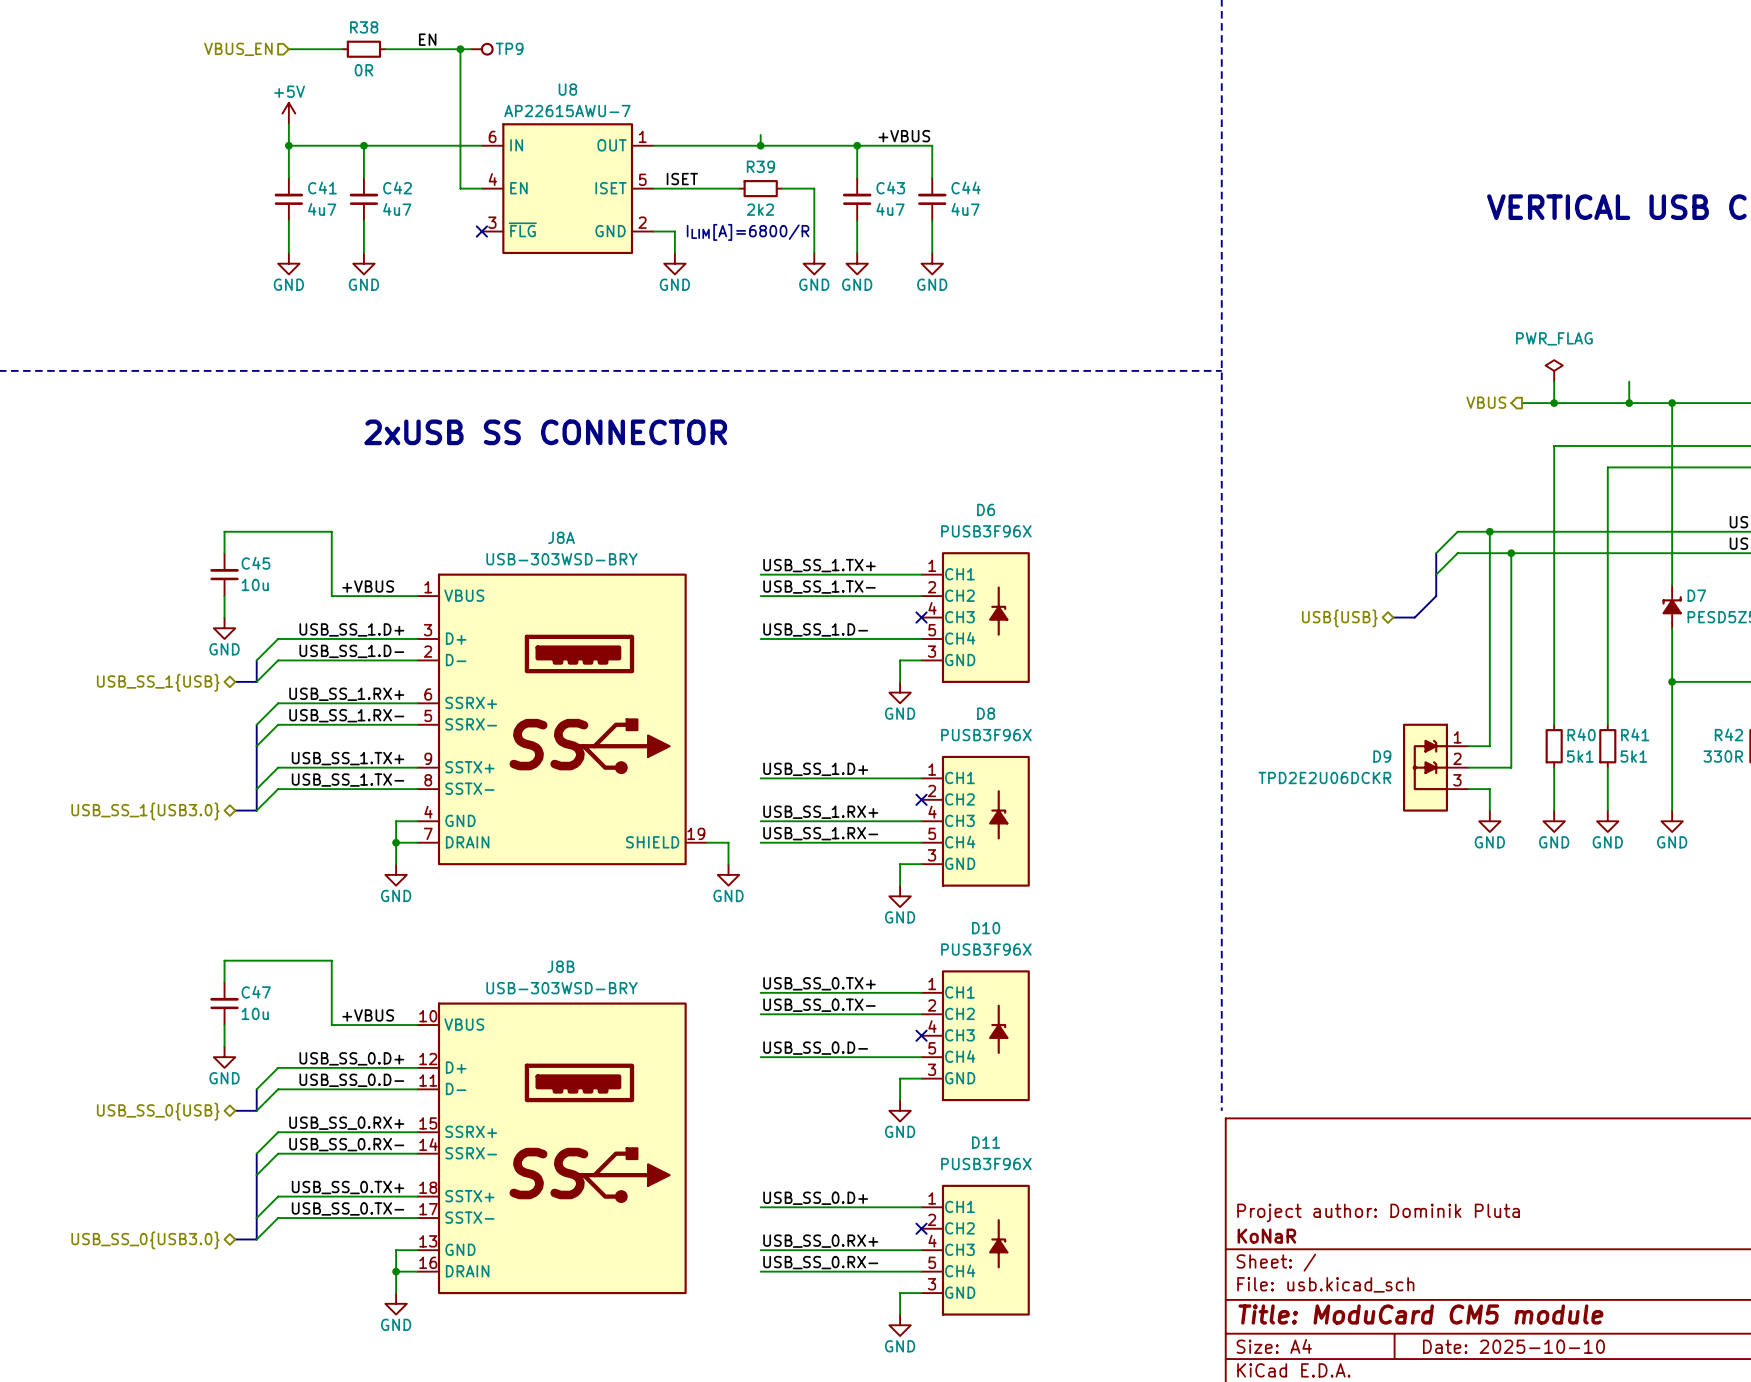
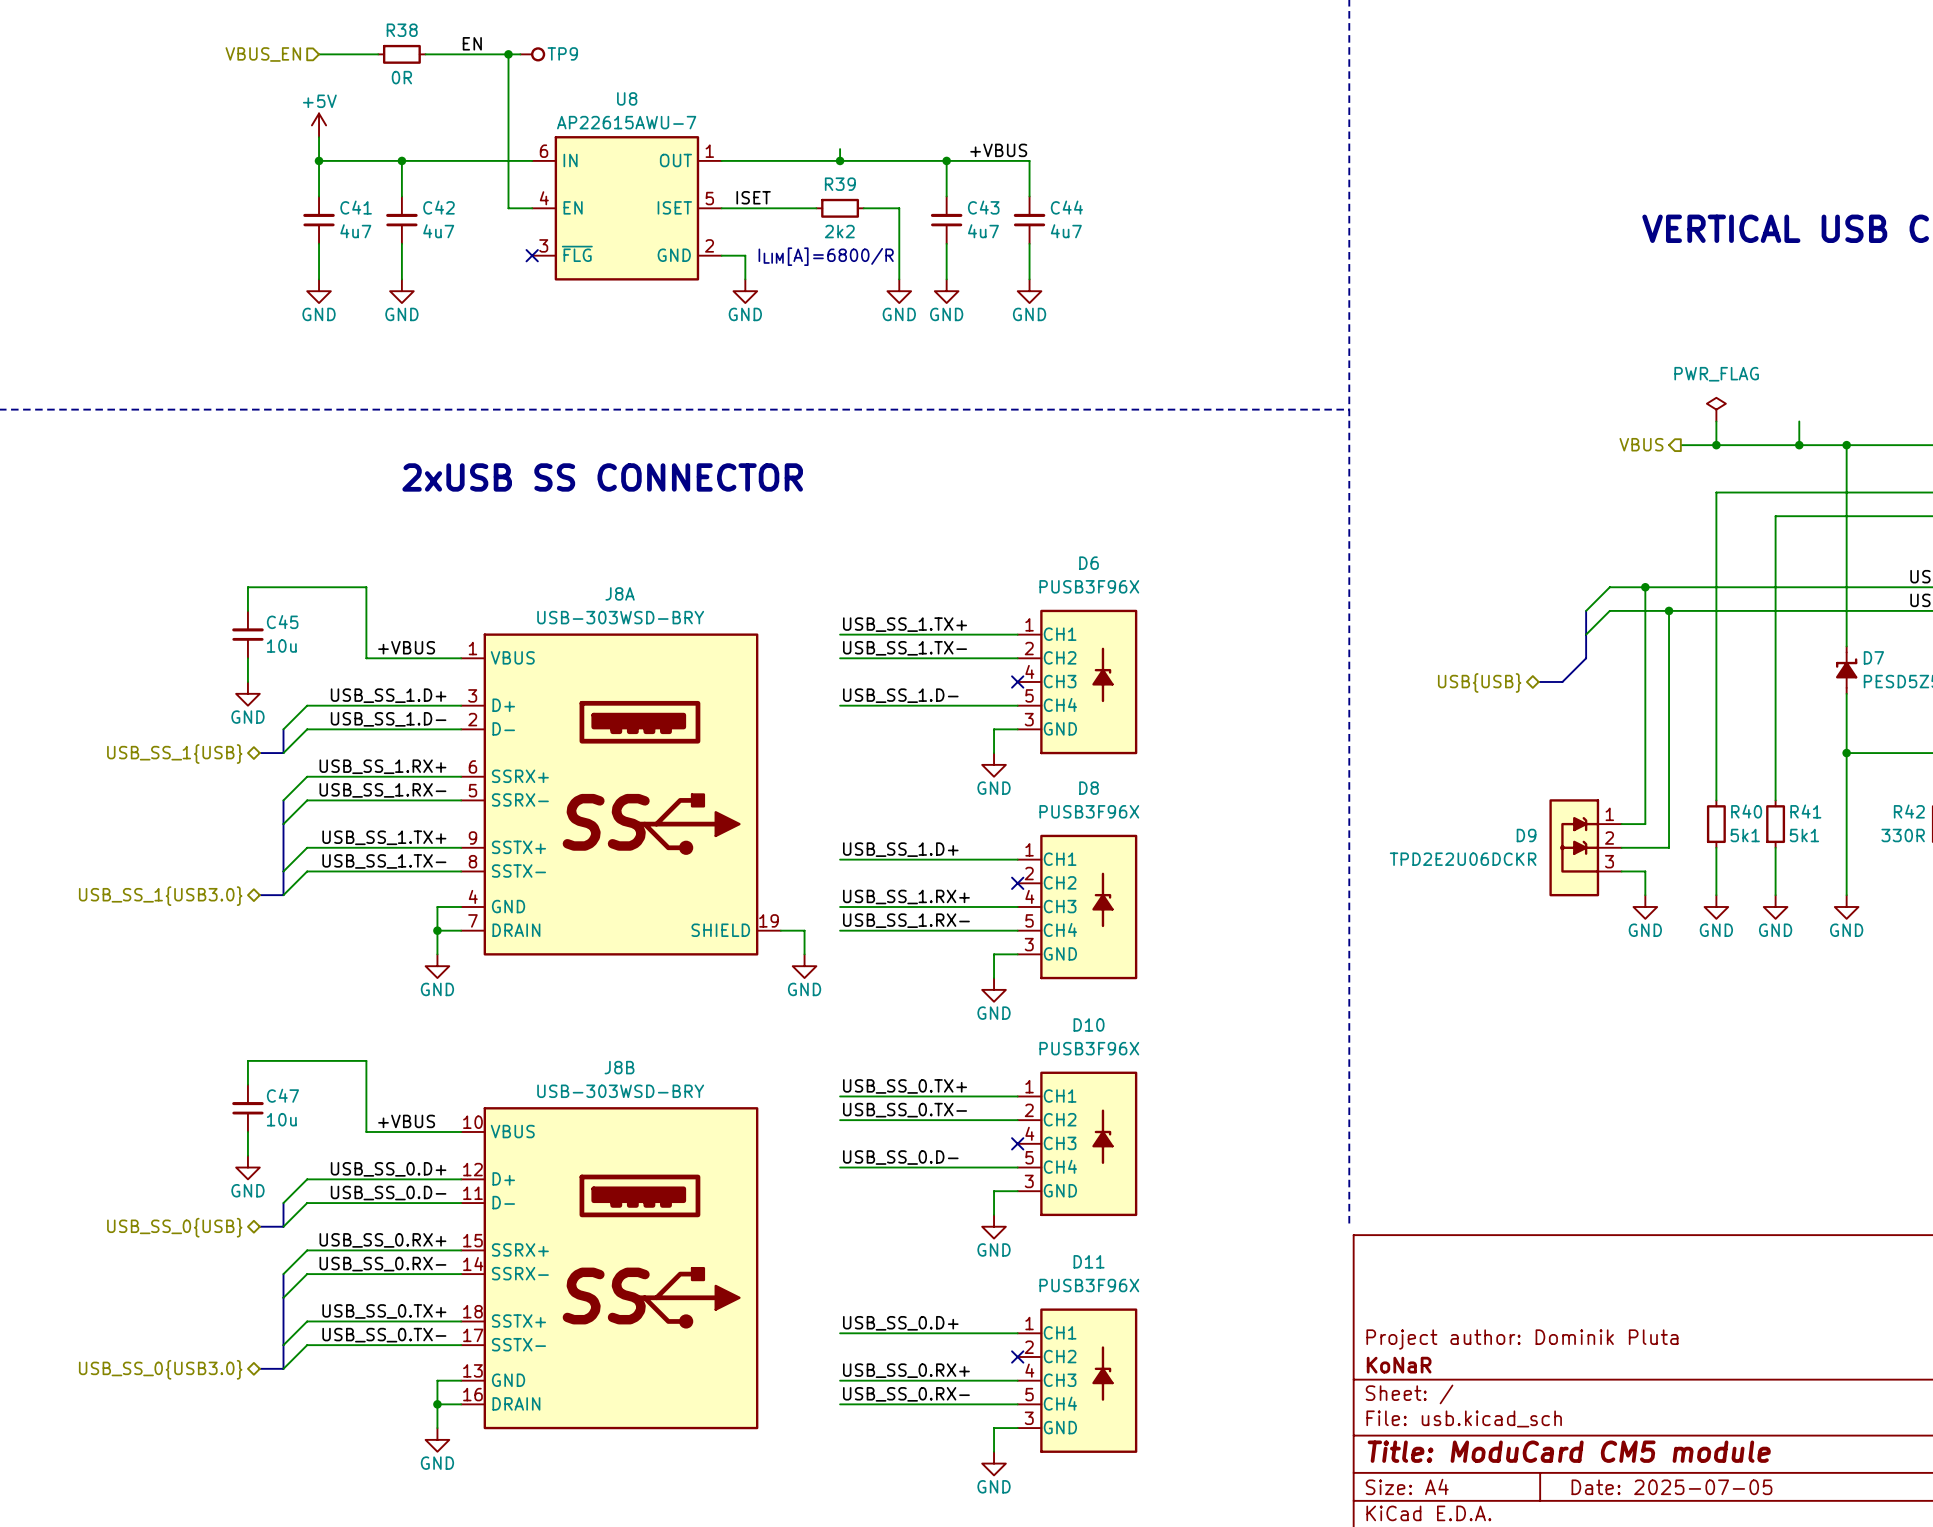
title block: Date: 2025-10-10 (1513, 1346) -> Date: 2025-07-05 (1671, 1487)

